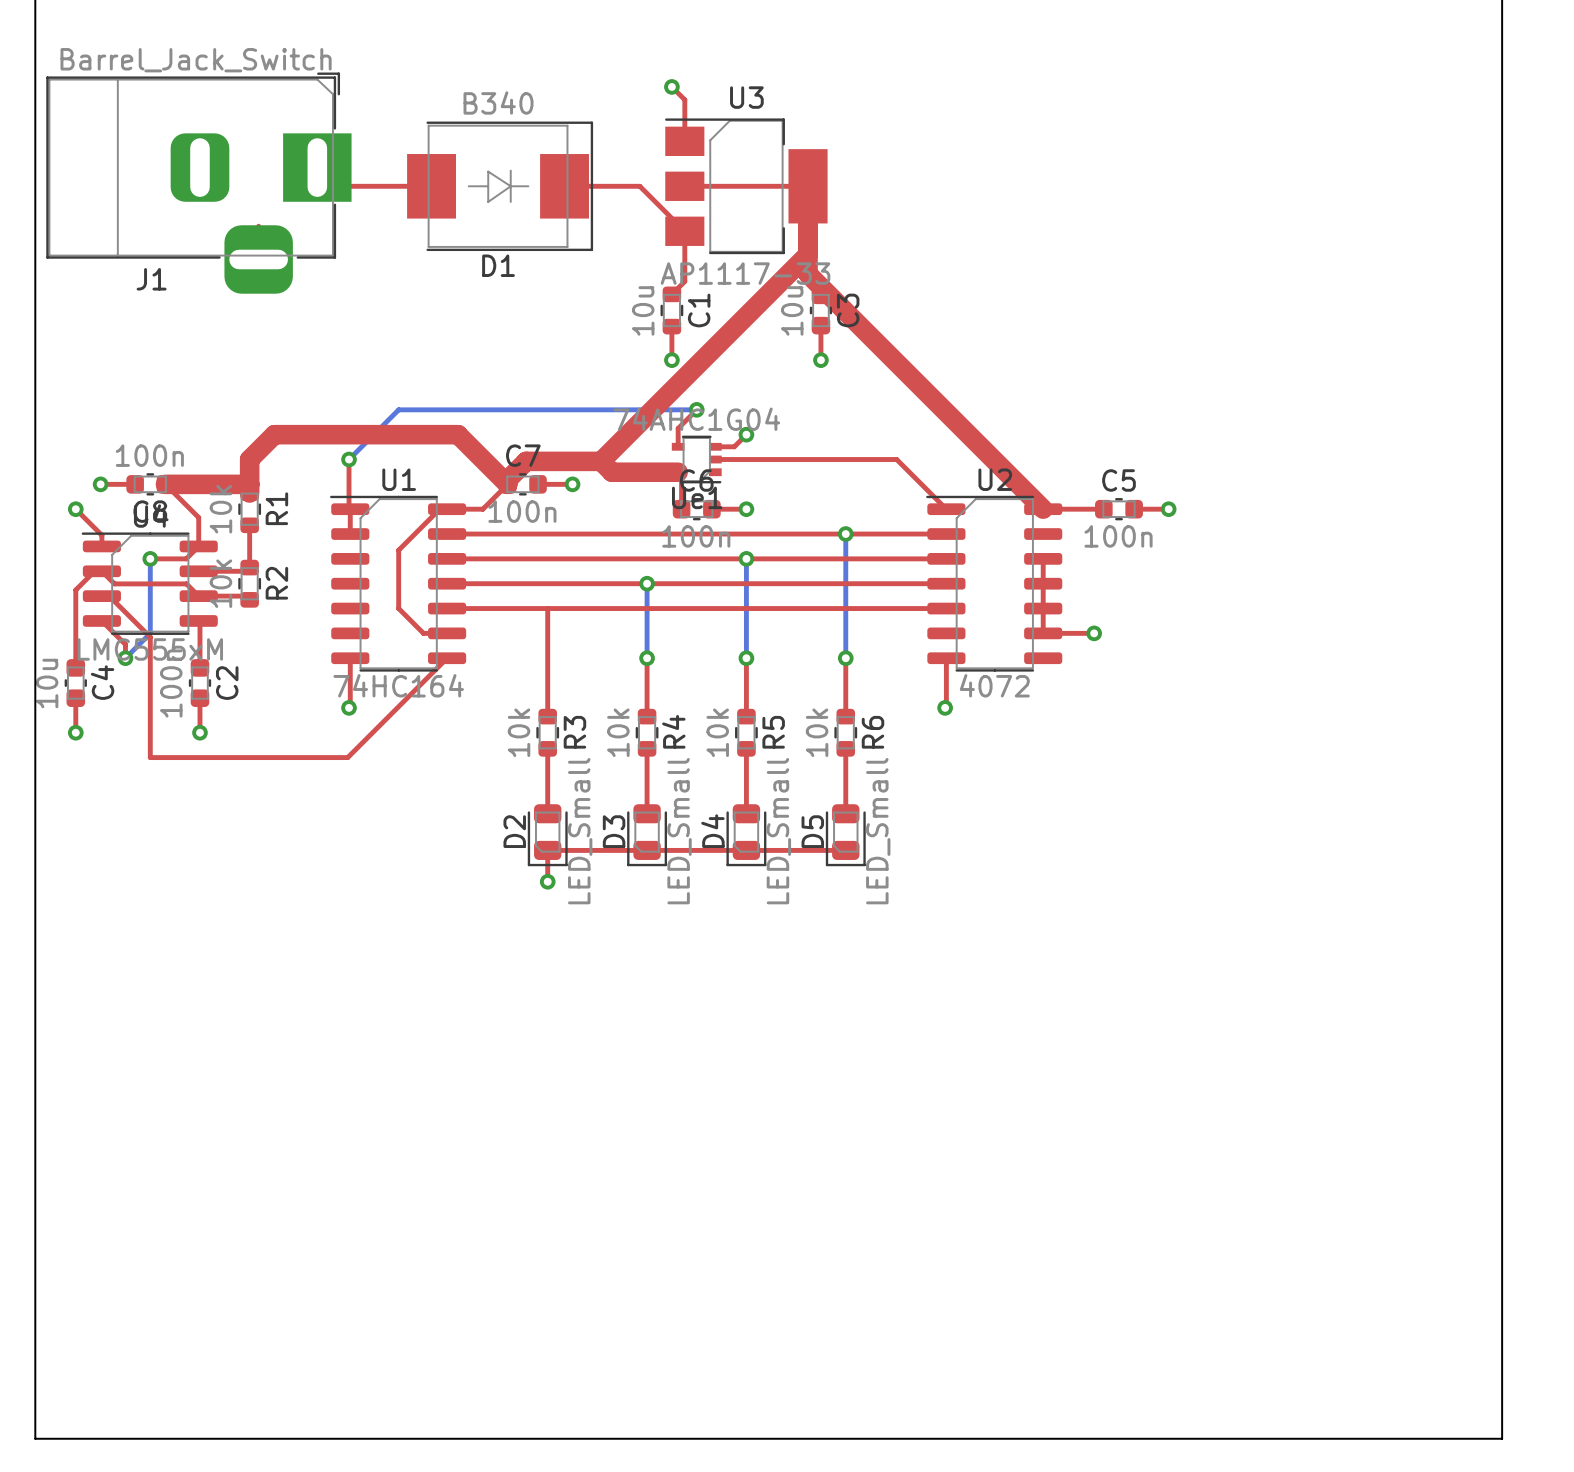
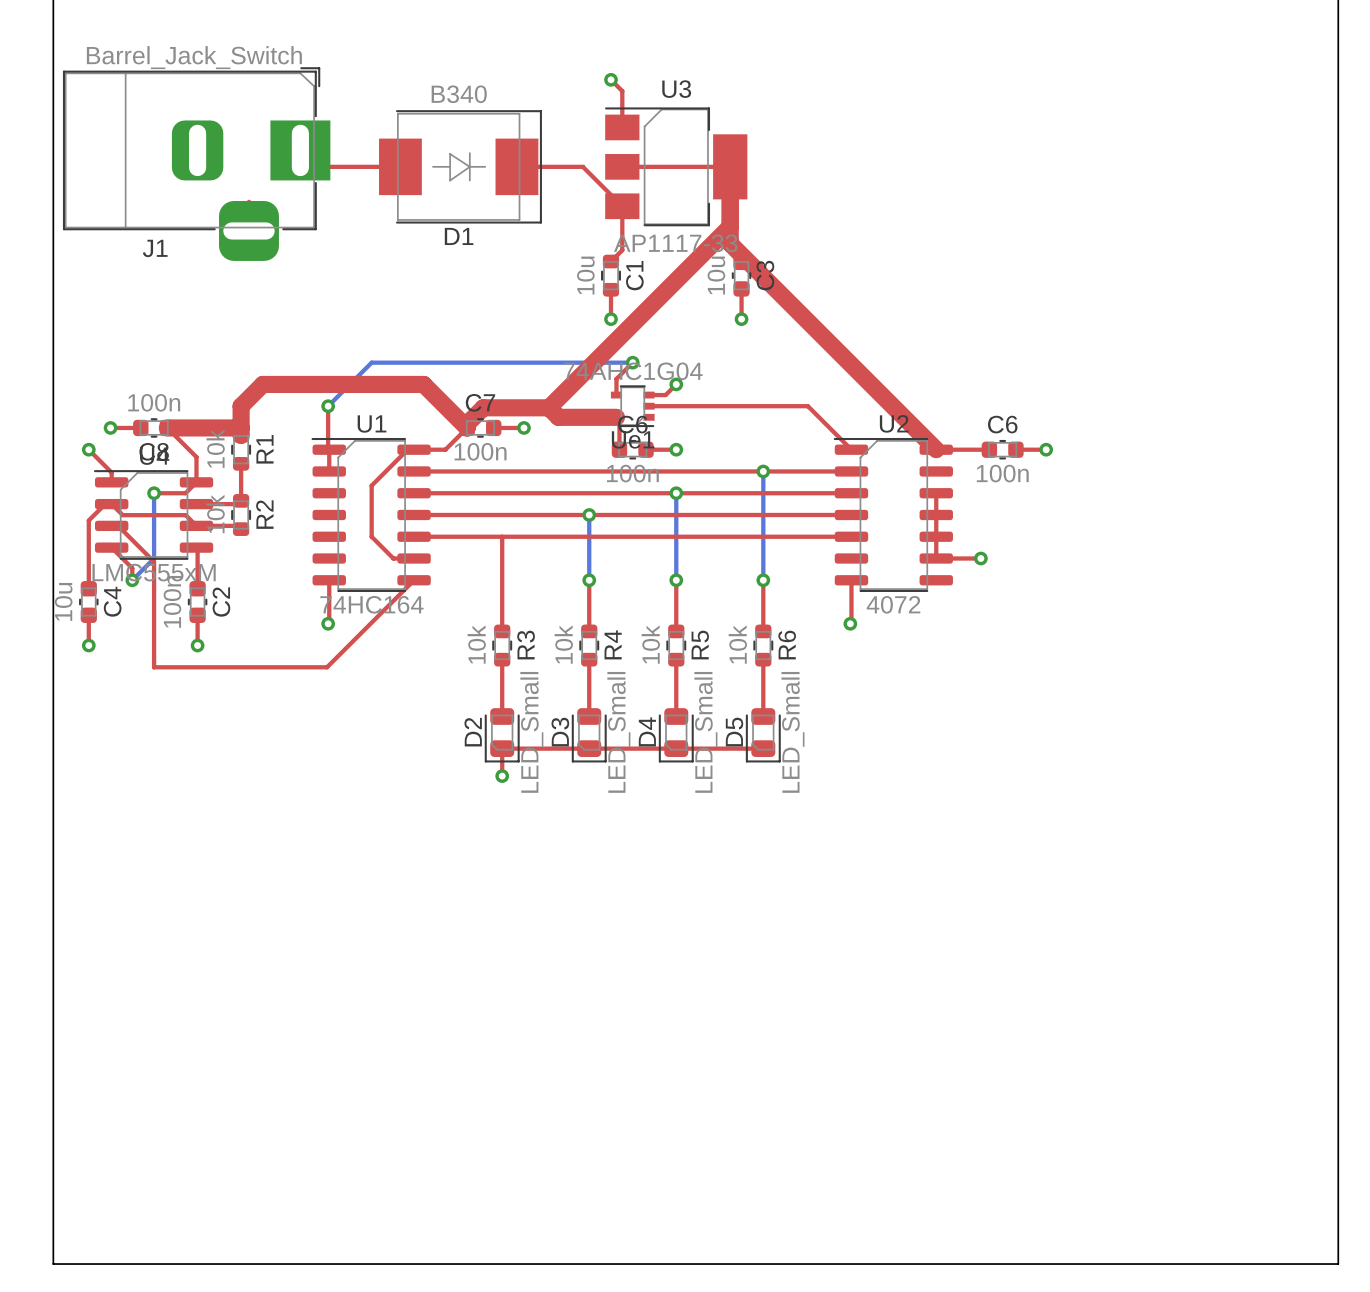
C5 name: C5 (1118, 480) -> C6 (1002, 424)

